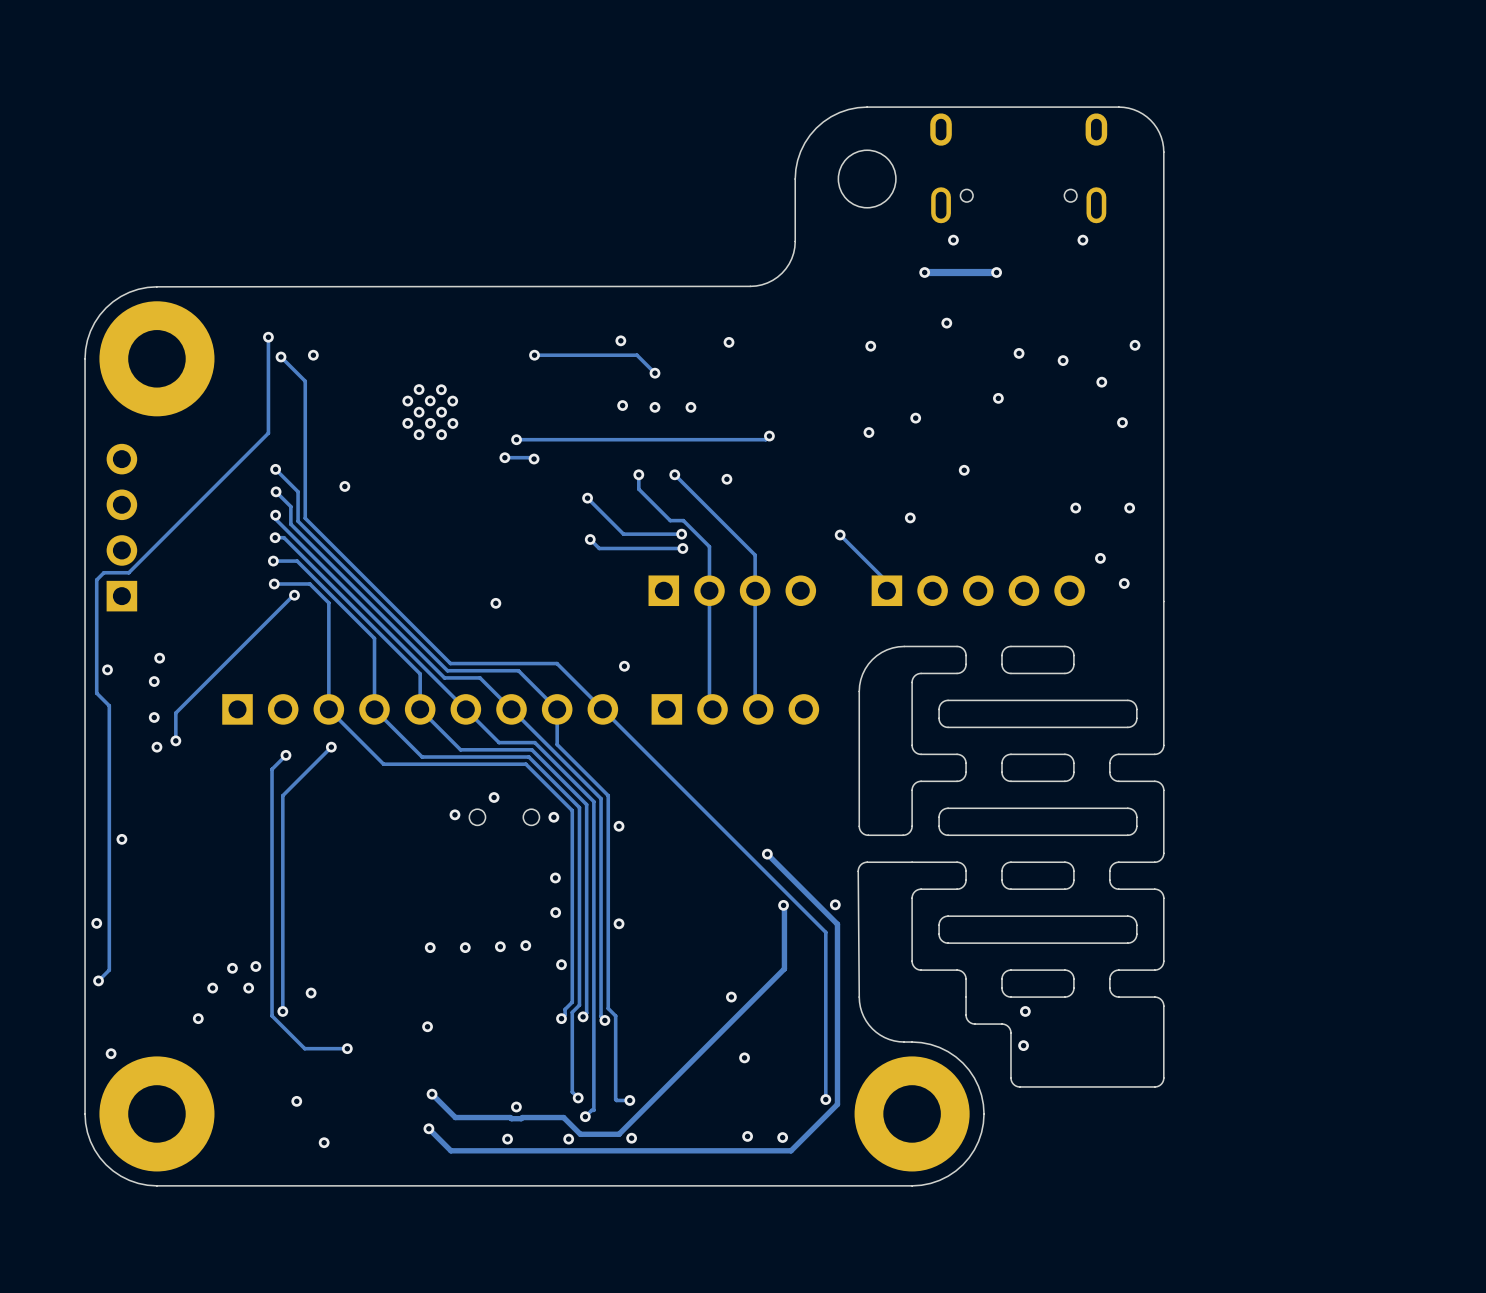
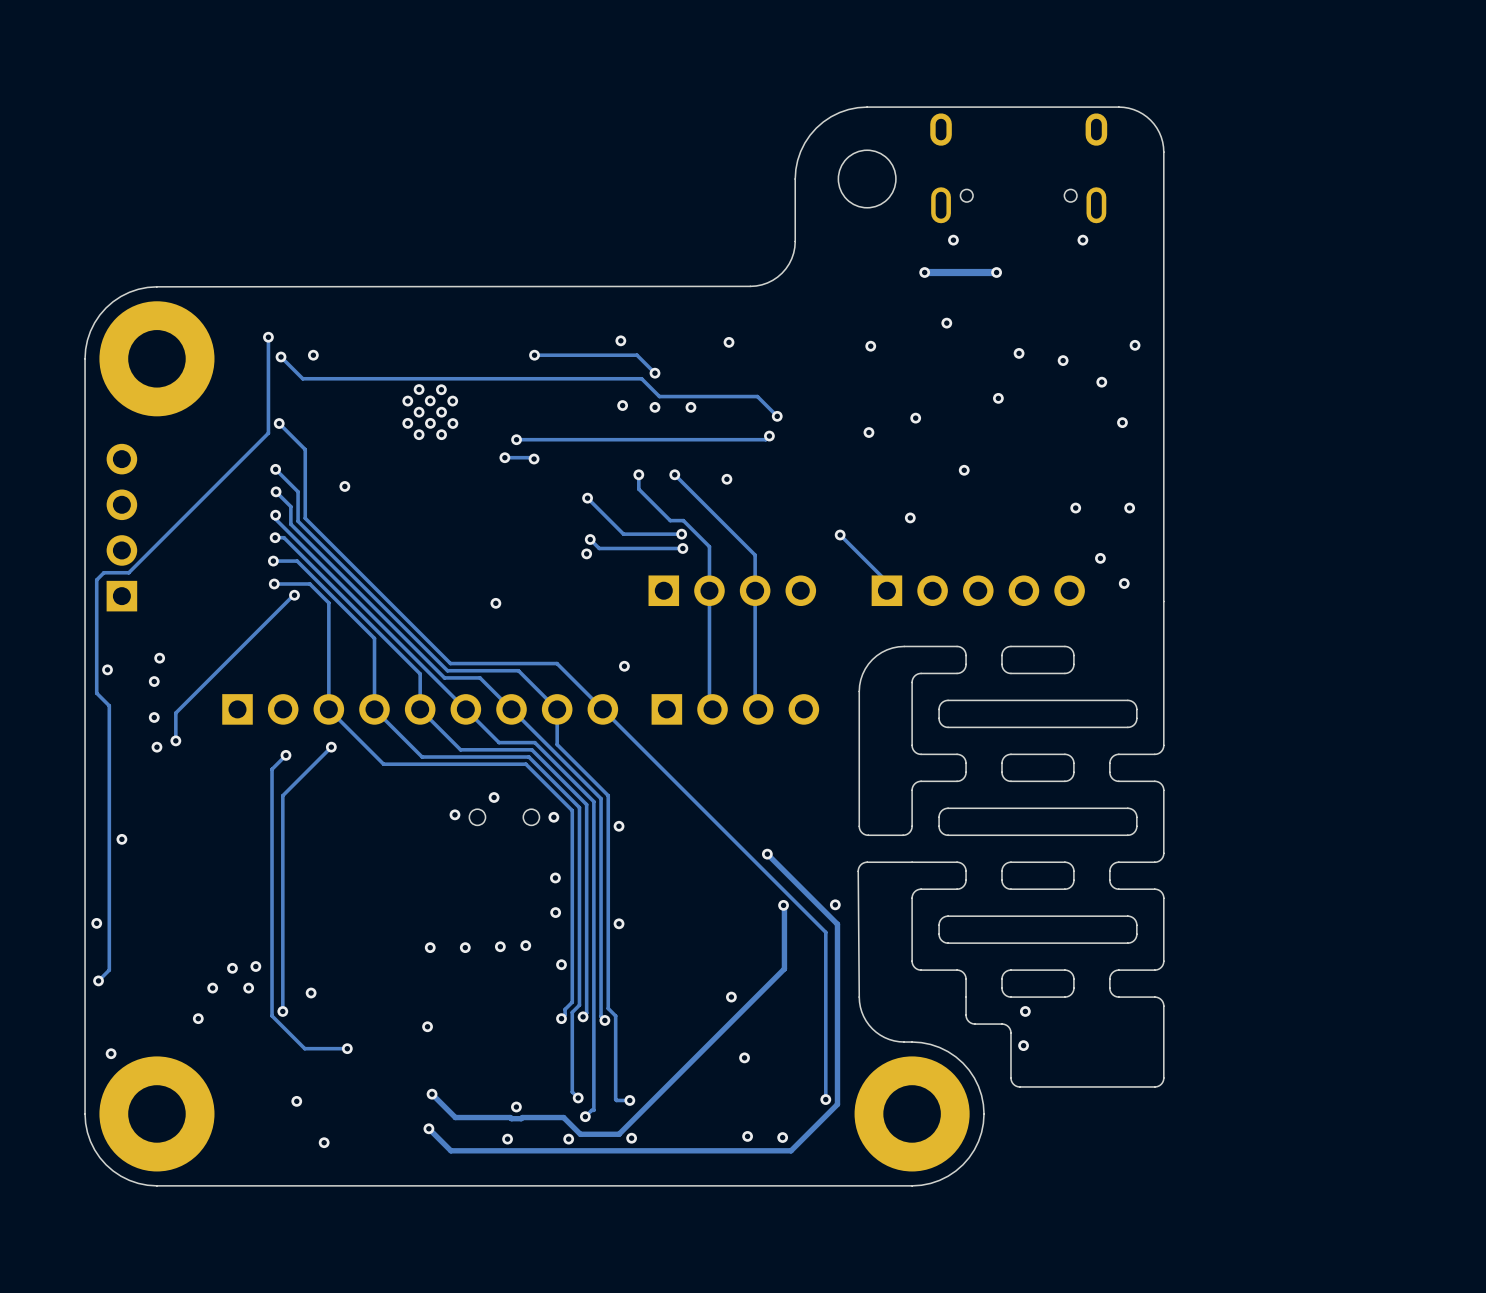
track: (302, 378) (305, 381) (305, 449) -> (279, 423) (305, 449)
track: none -> (302, 378) (641, 378) (659, 396) (757, 396) (777, 416)
via: none -> (777, 416)
via: none -> (279, 423)
via: none -> (586, 553)

